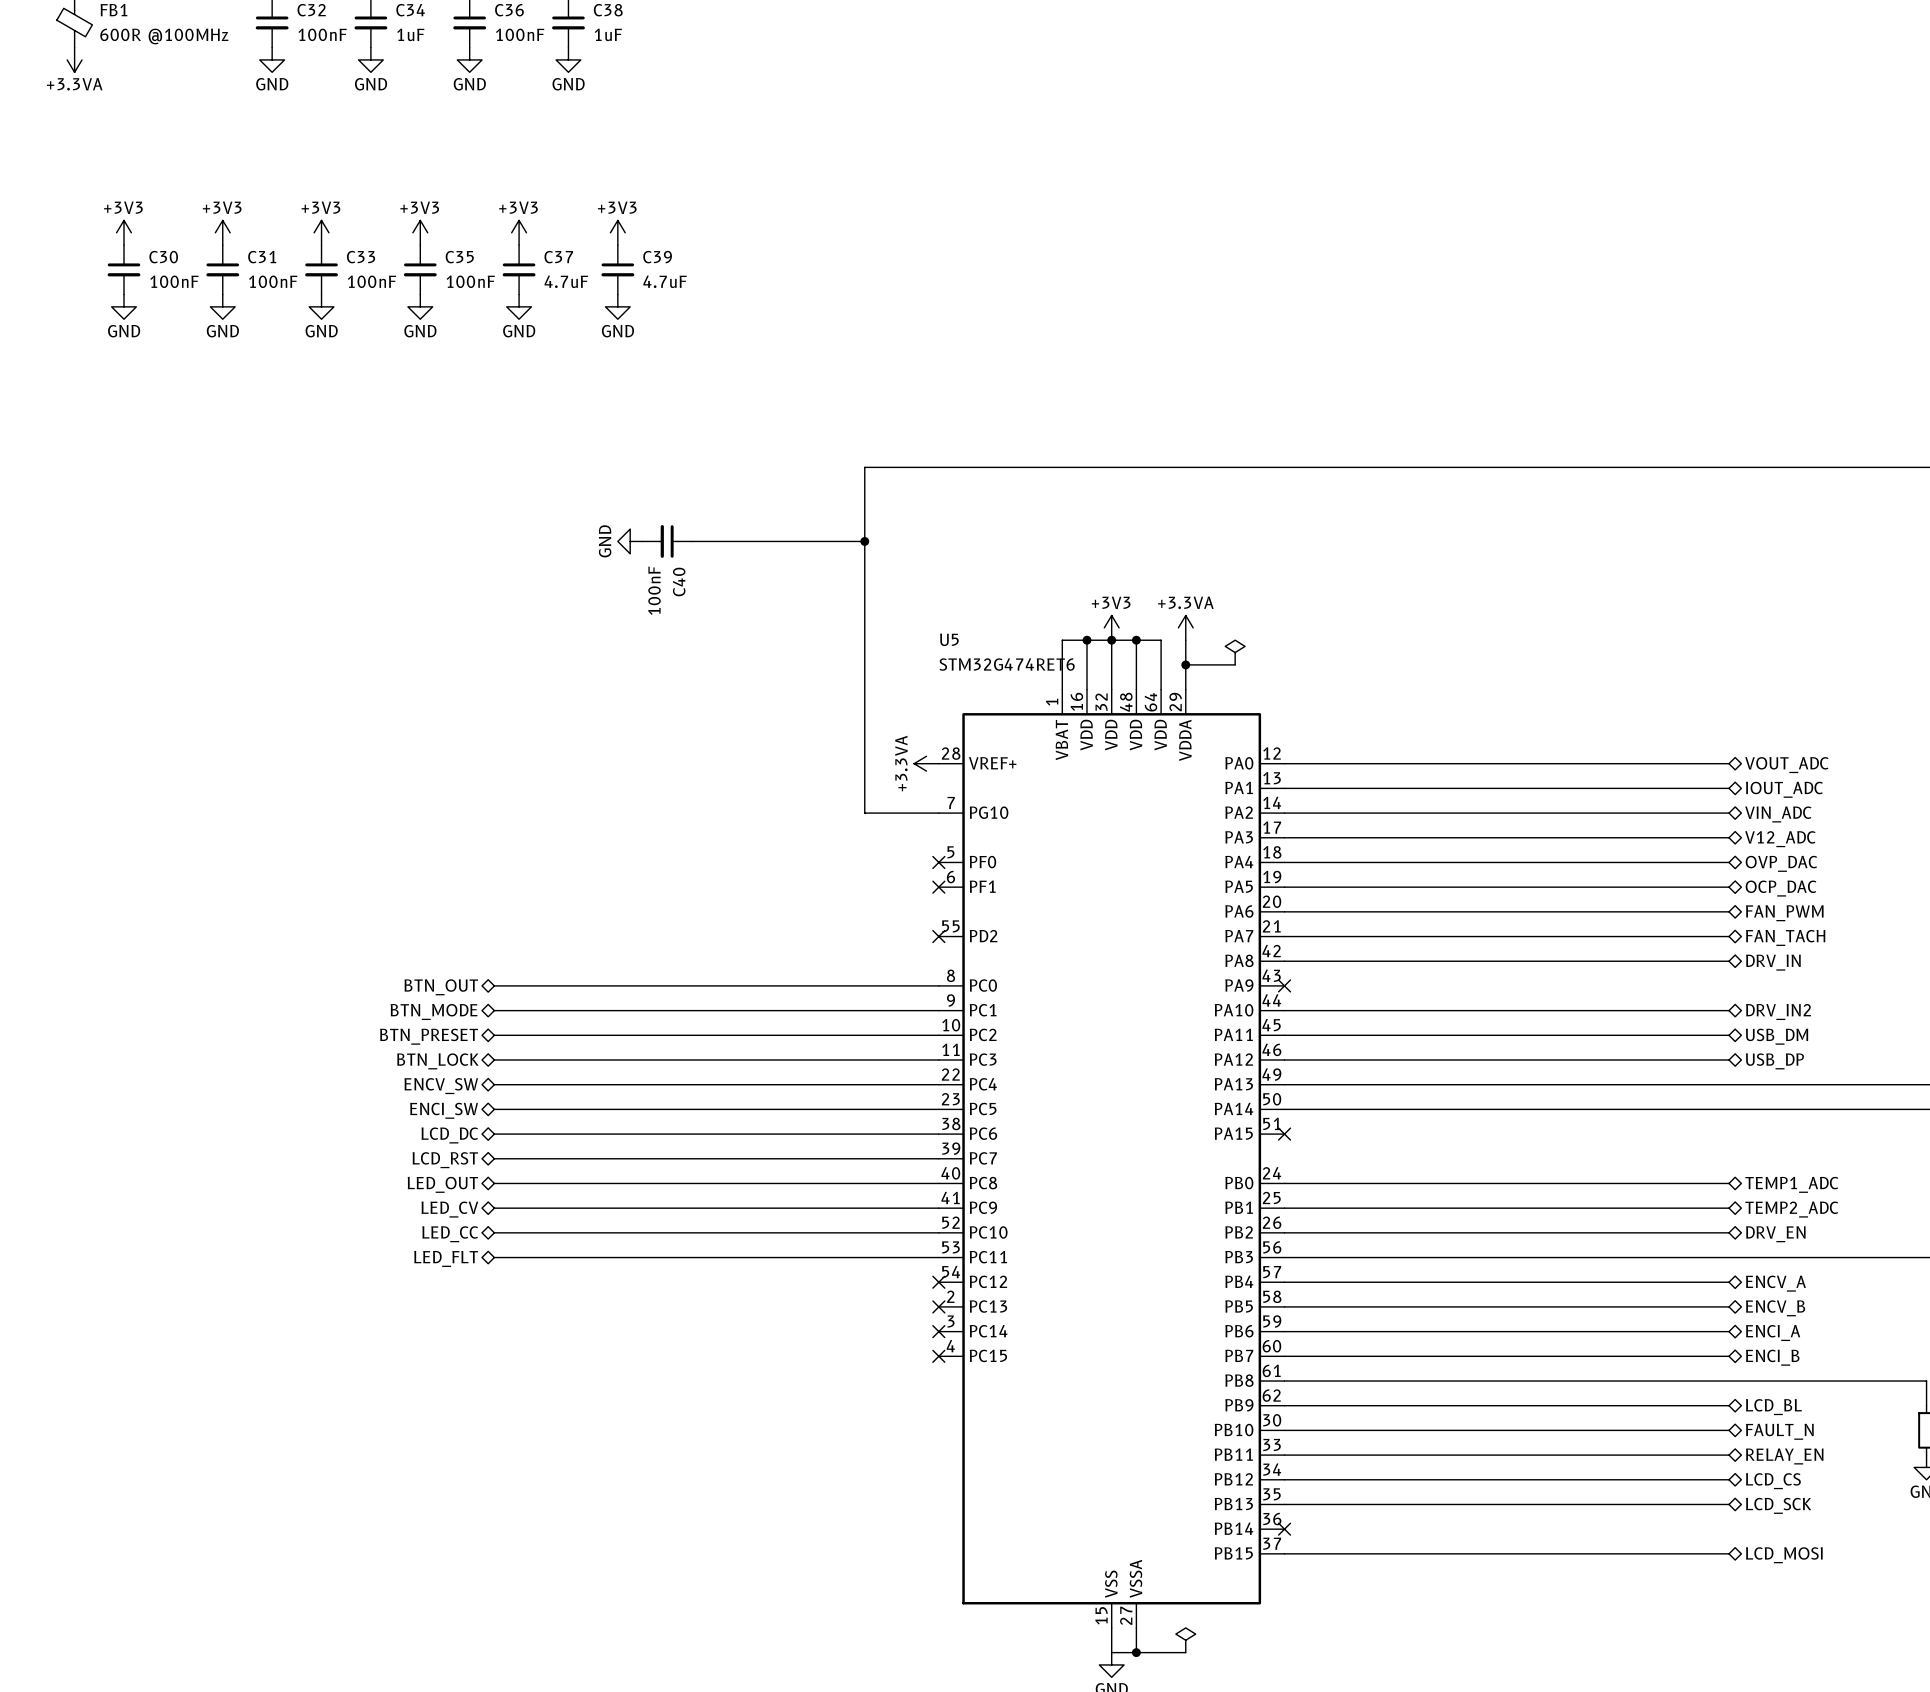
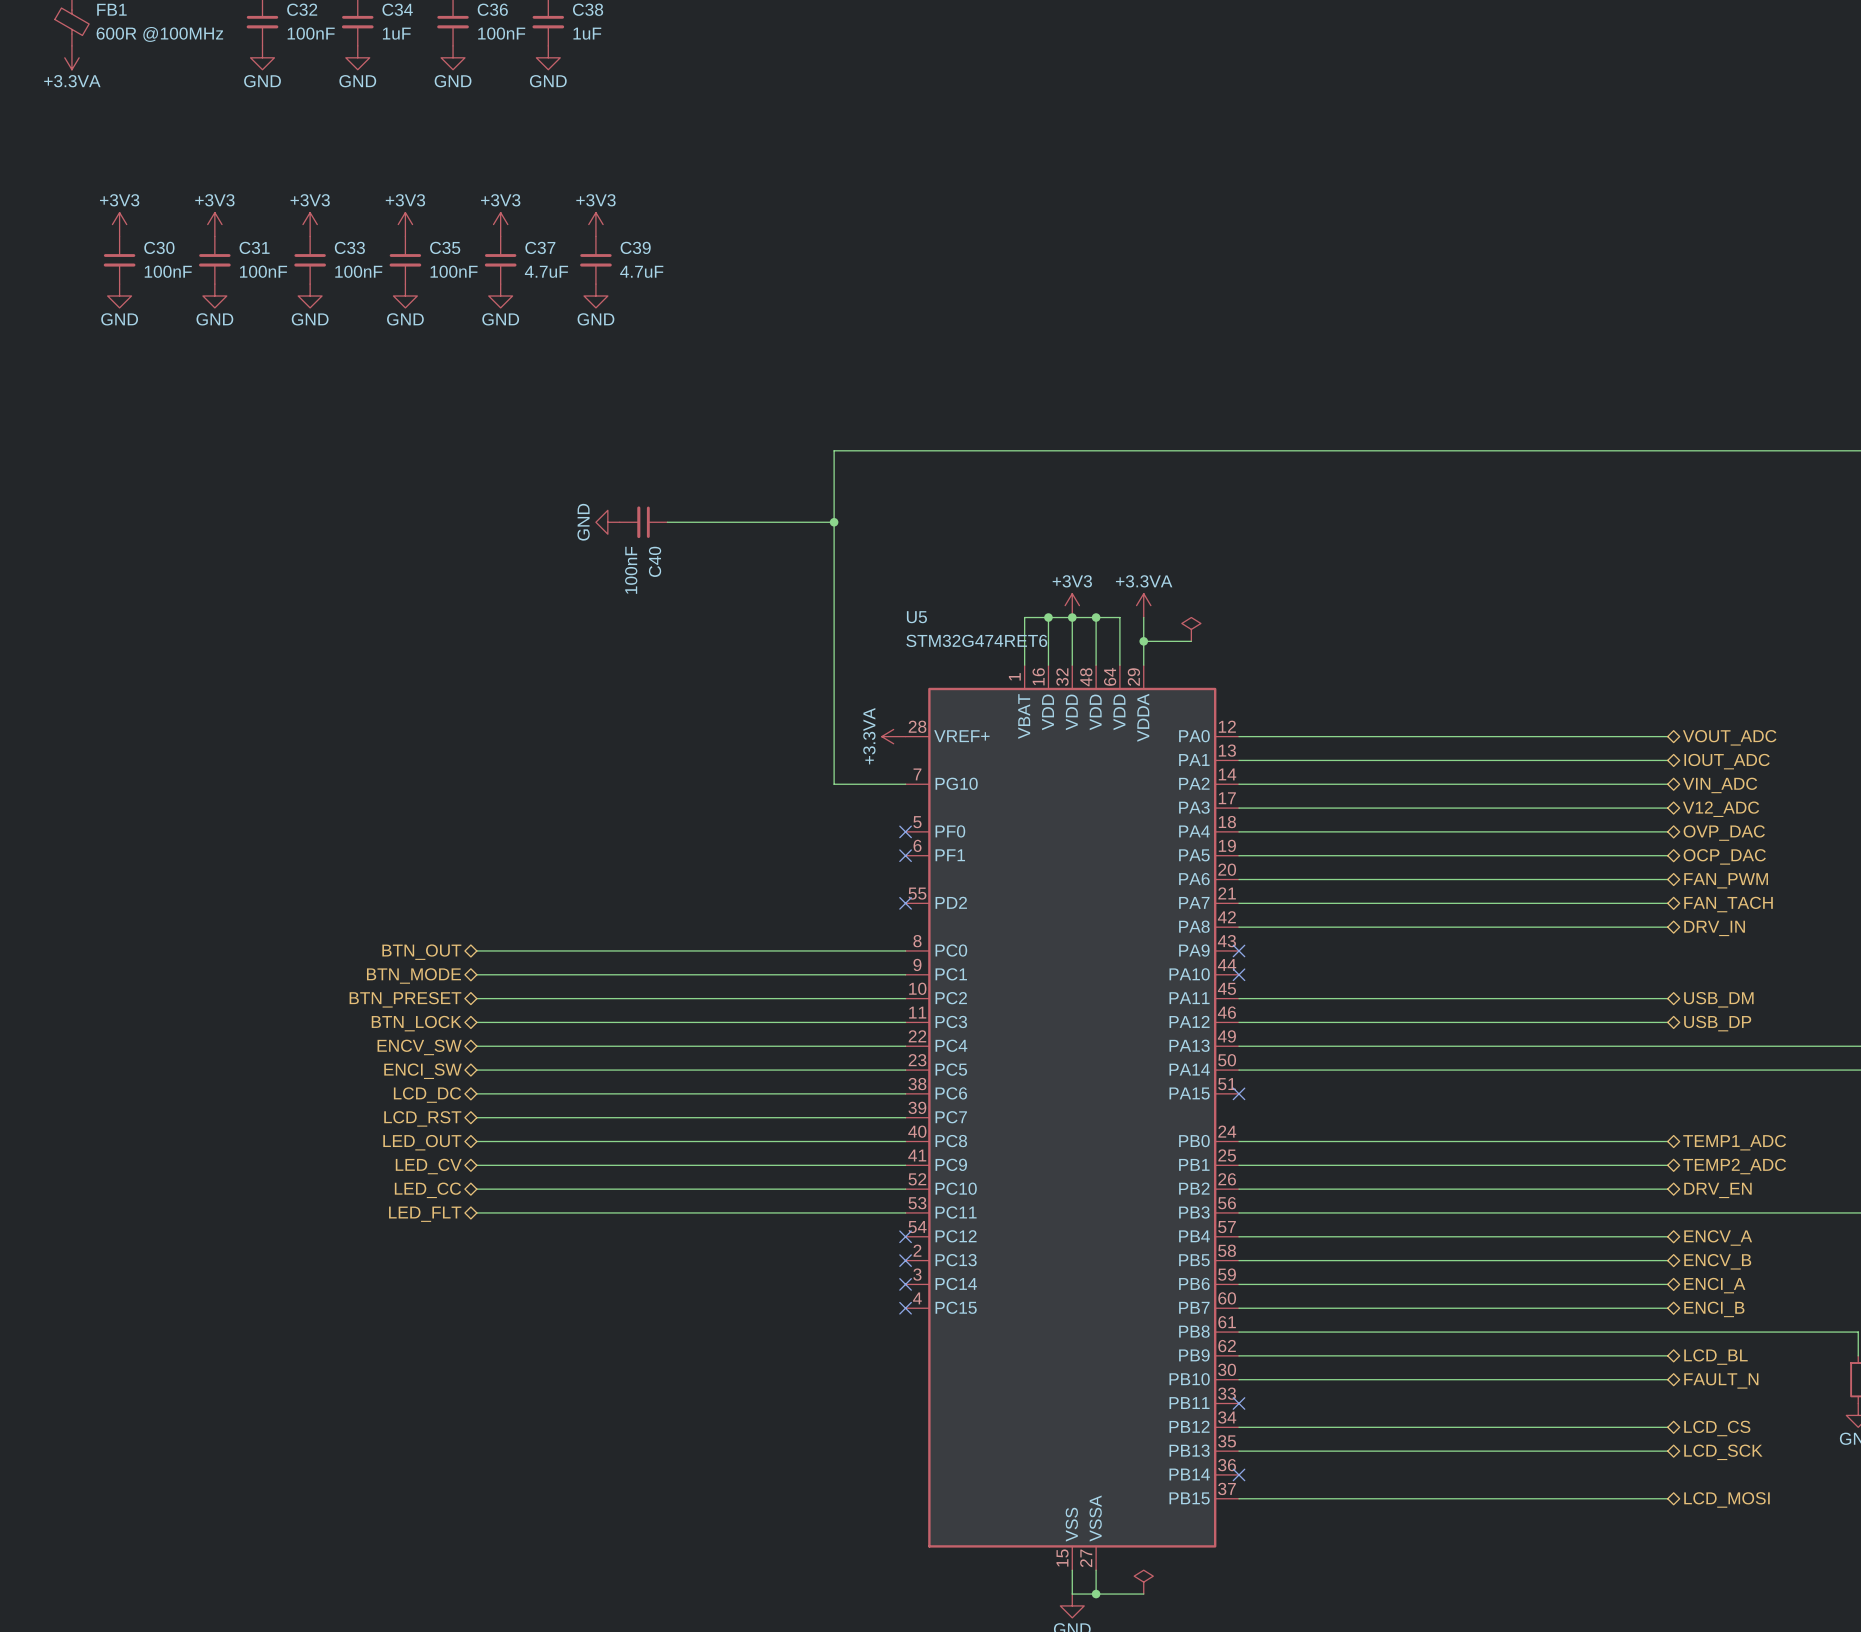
wire: (1284, 1010) (1729, 1010) -> none
no-connect mark: none -> (1239, 974)
hierarchical label: DRV_IN2 (1778, 1012) -> none
wire: (1284, 1455) (1729, 1455) -> none
no-connect mark: none -> (1239, 1403)
hierarchical label: RELAY_EN (1784, 1456) -> none

